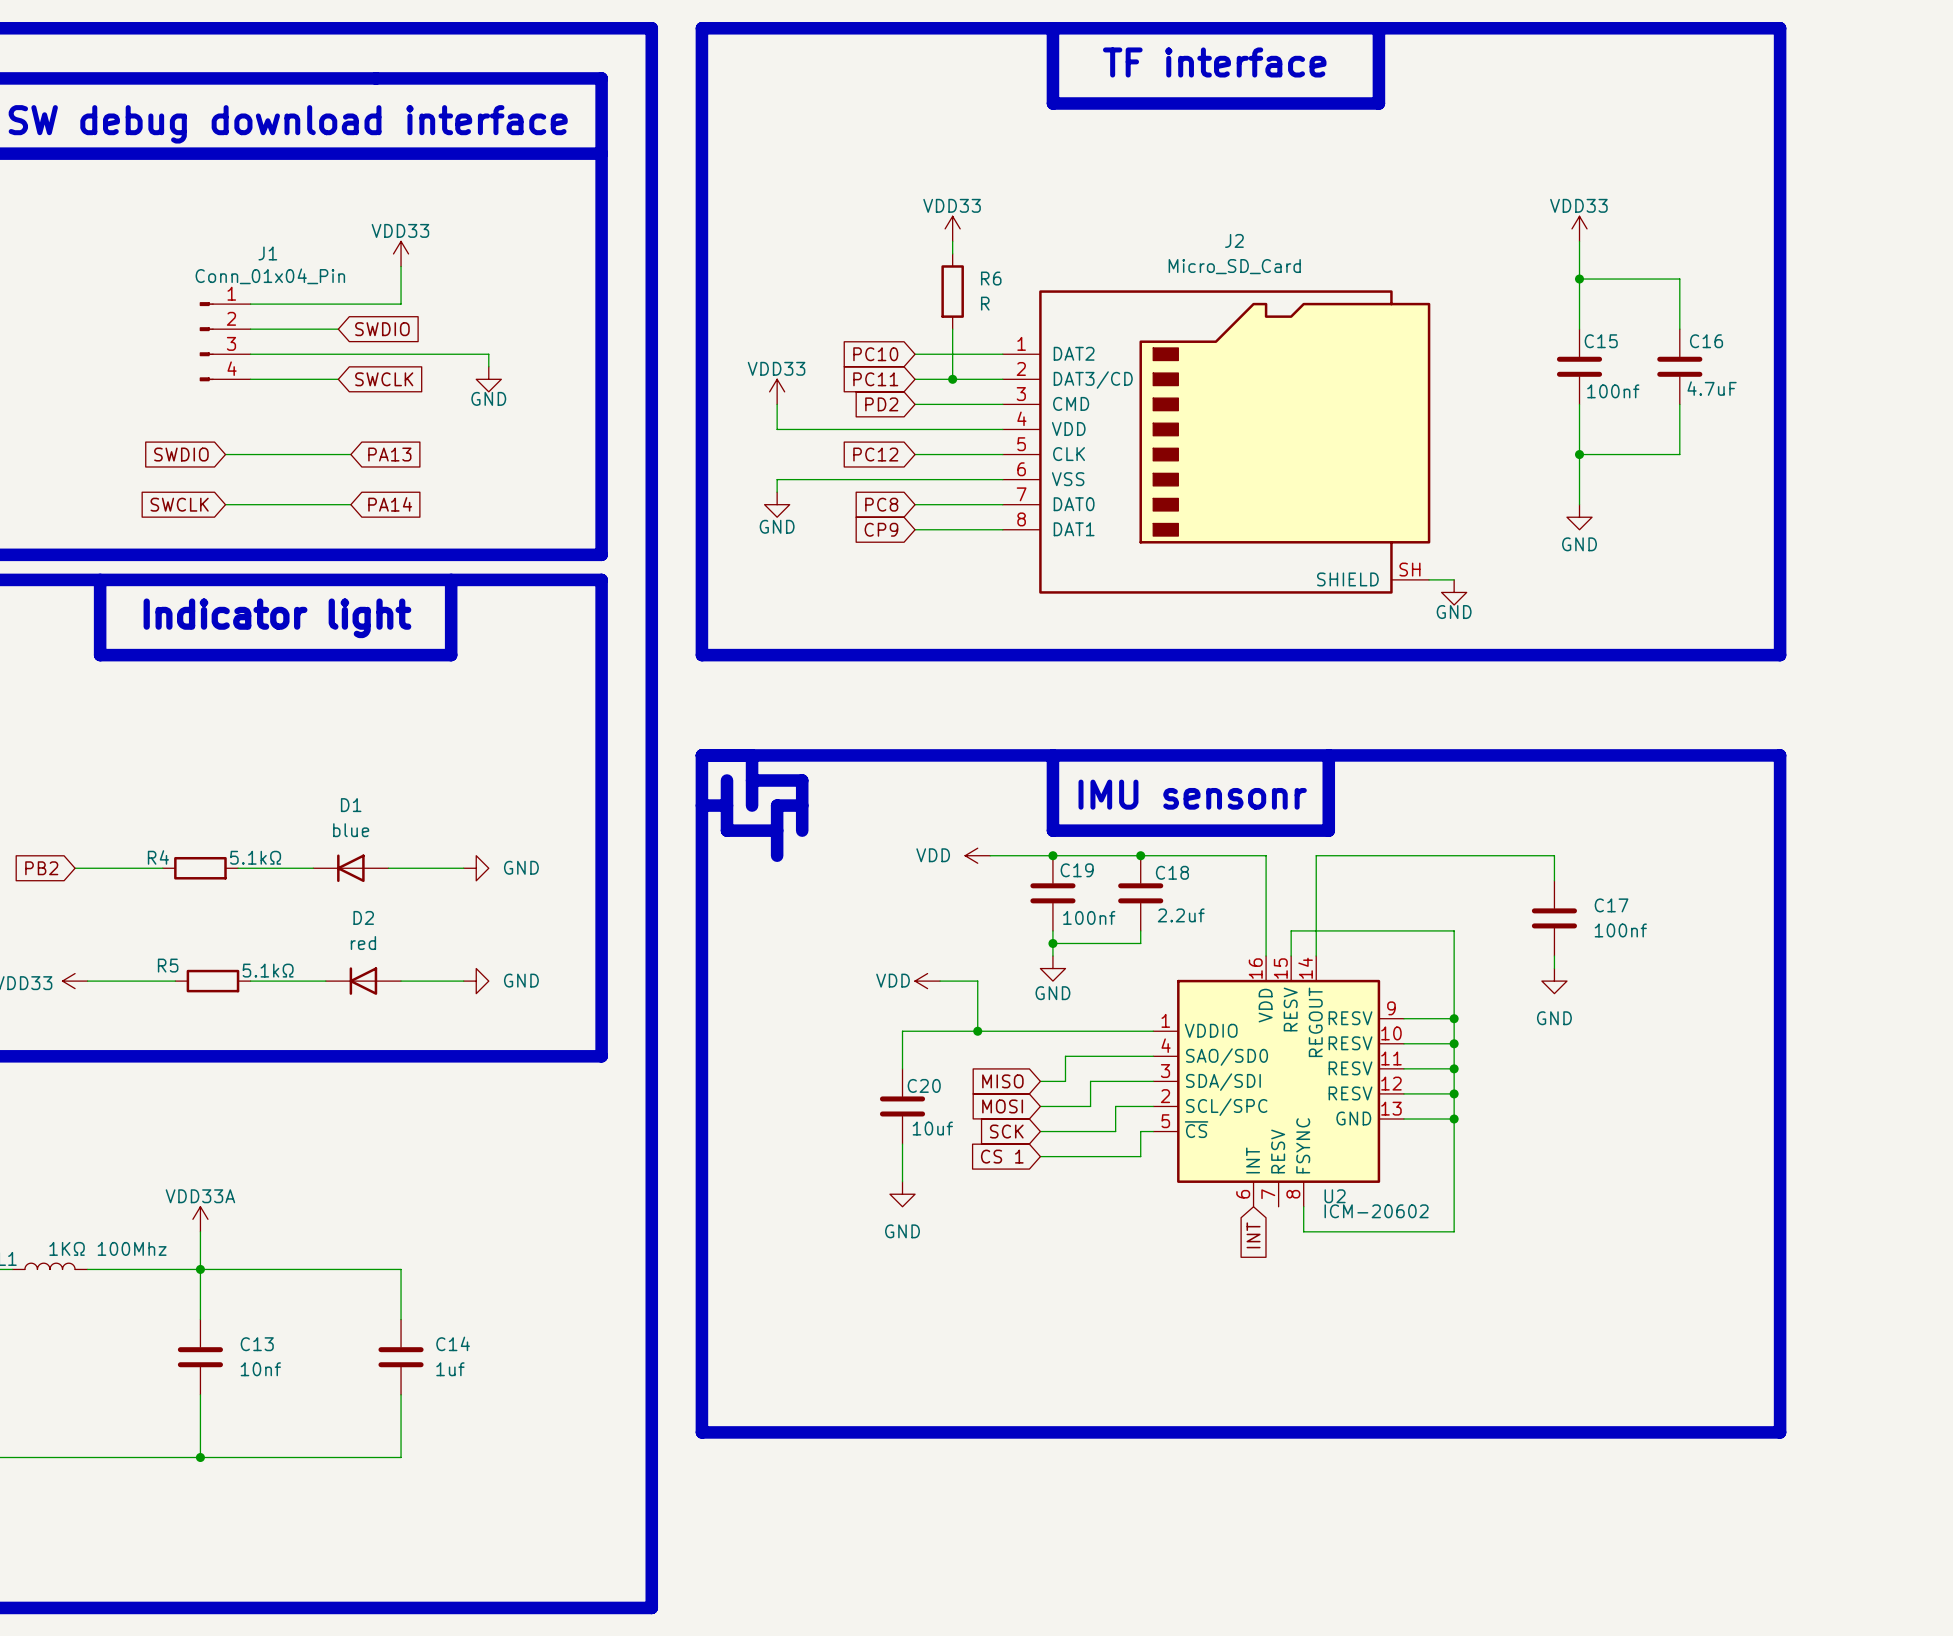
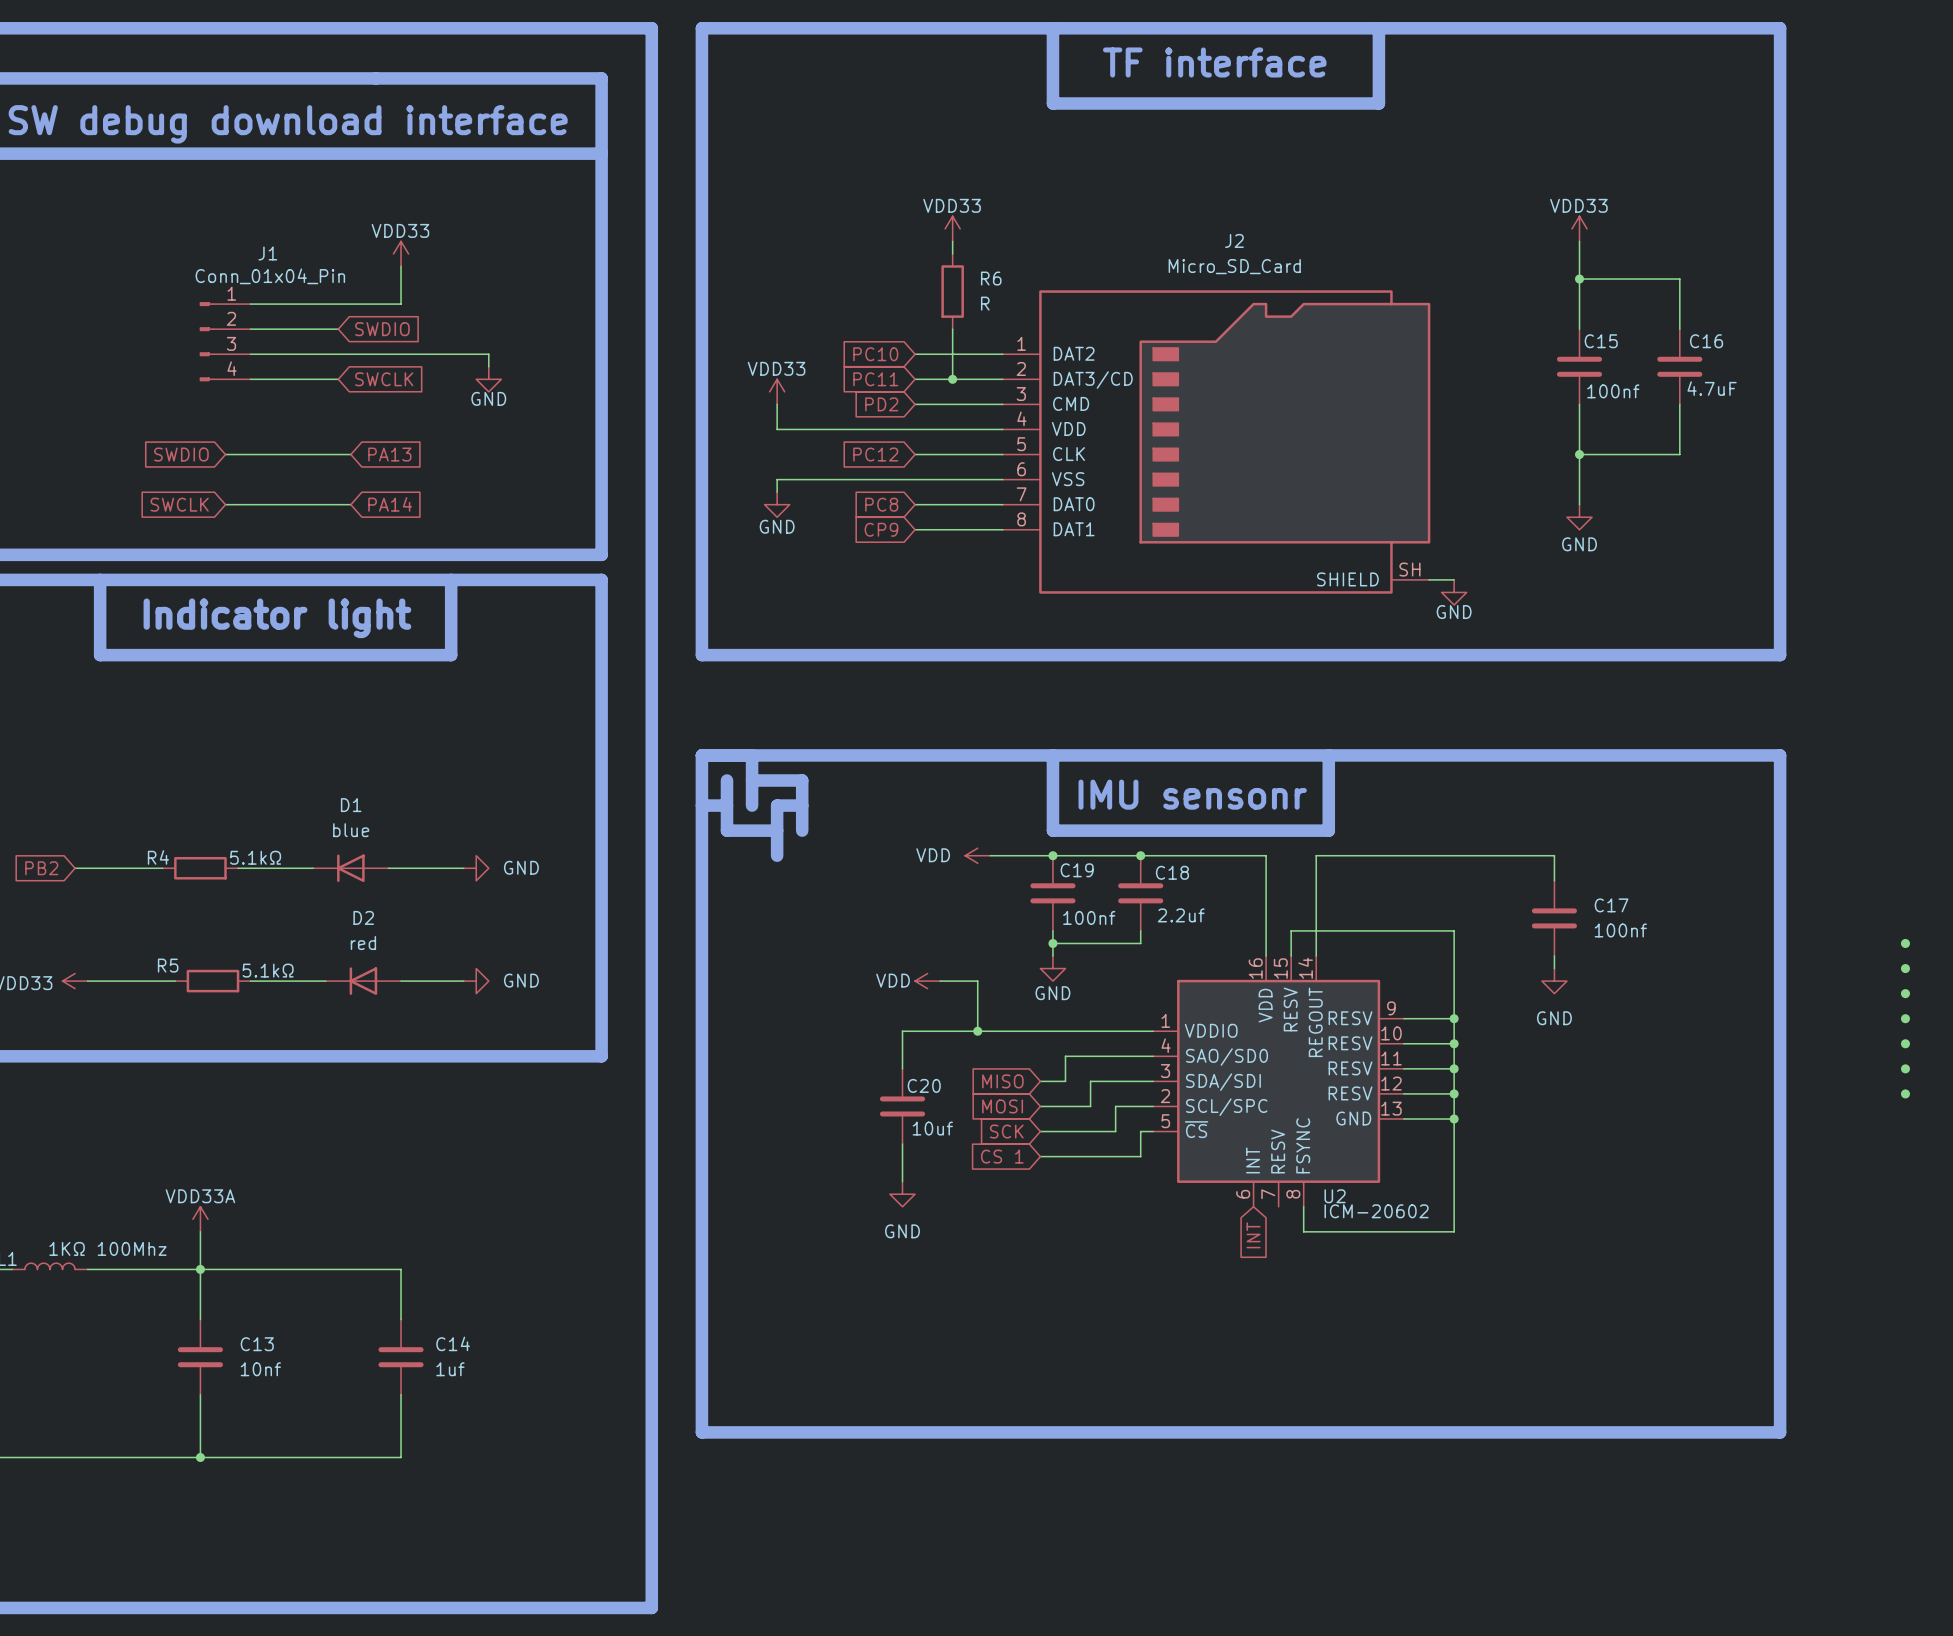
junction: none -> (1905, 943)
junction: none -> (1905, 968)
junction: none -> (1905, 993)
junction: none -> (1905, 1018)
junction: none -> (1905, 1043)
junction: none -> (1905, 1068)
junction: none -> (1905, 1093)

